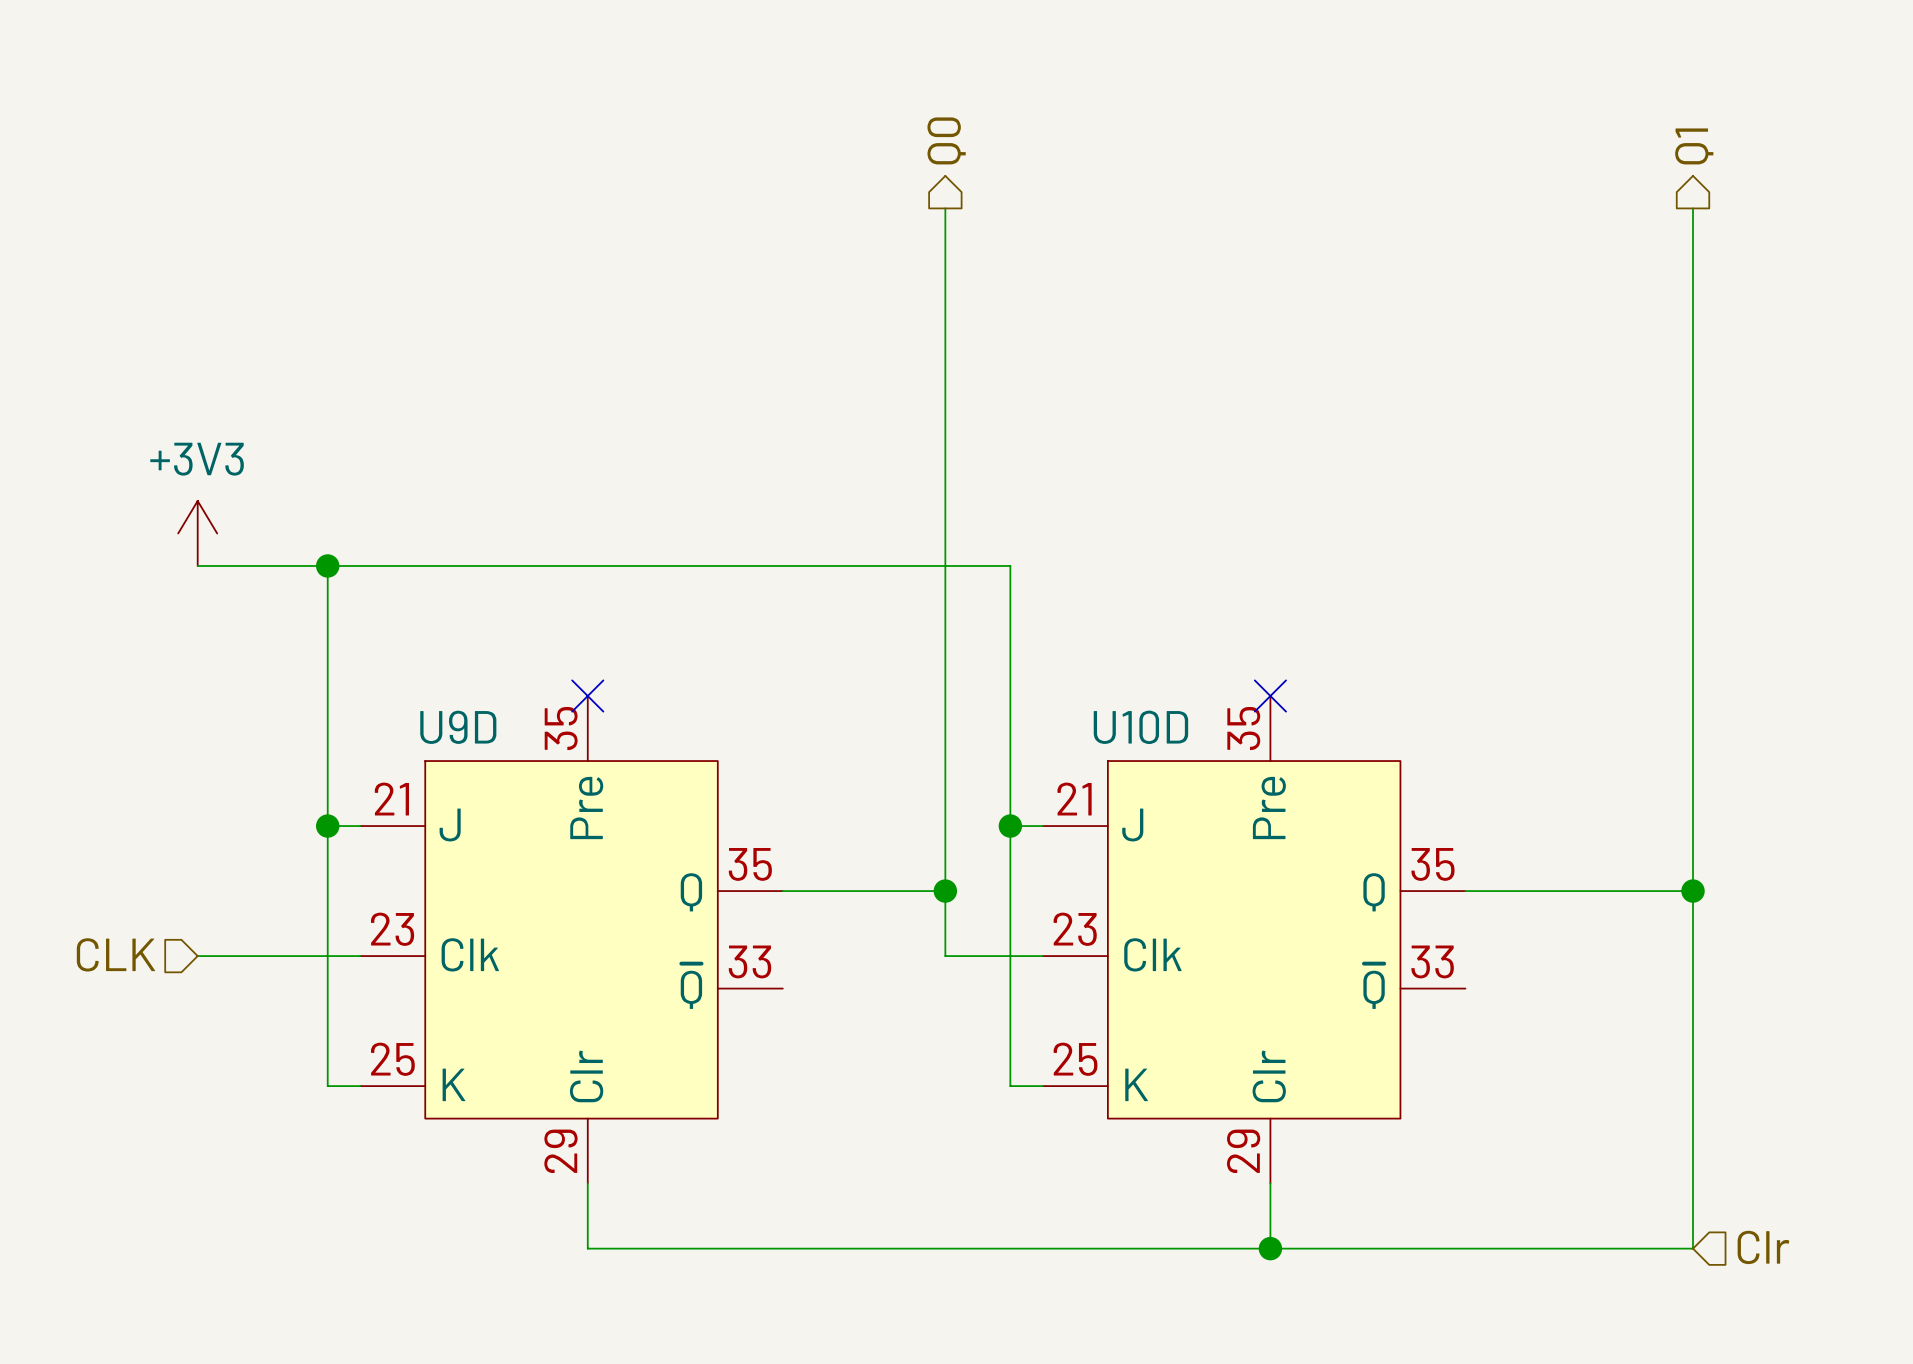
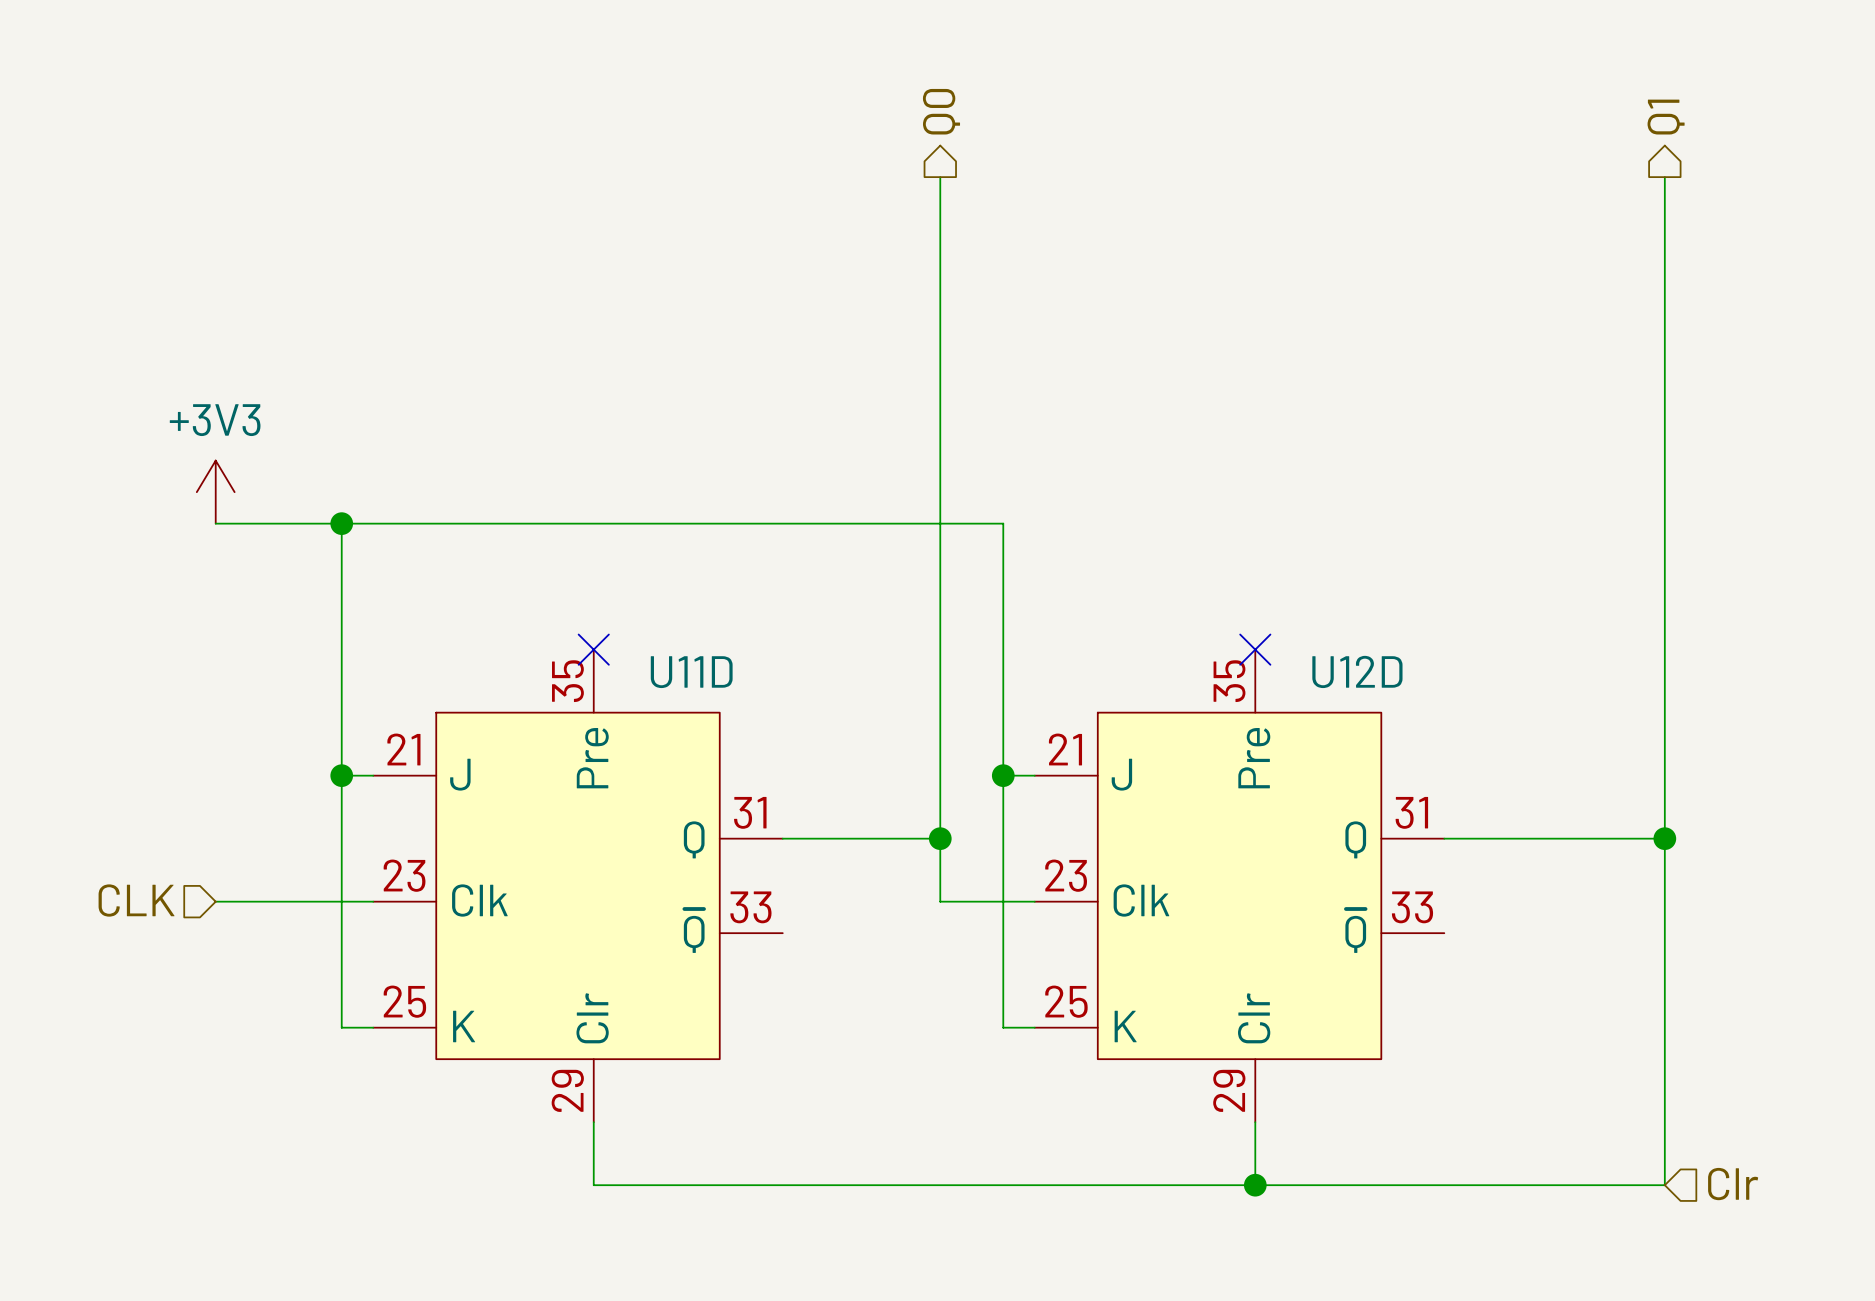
U9D name: U9D (458, 727) -> U11D (691, 672)
U10D name: U10D (1140, 727) -> U12D (1357, 671)
U9D pin number: 35 (750, 864) -> 31 (750, 812)
U10D pin number: 35 (1432, 864) -> 31 (1411, 812)

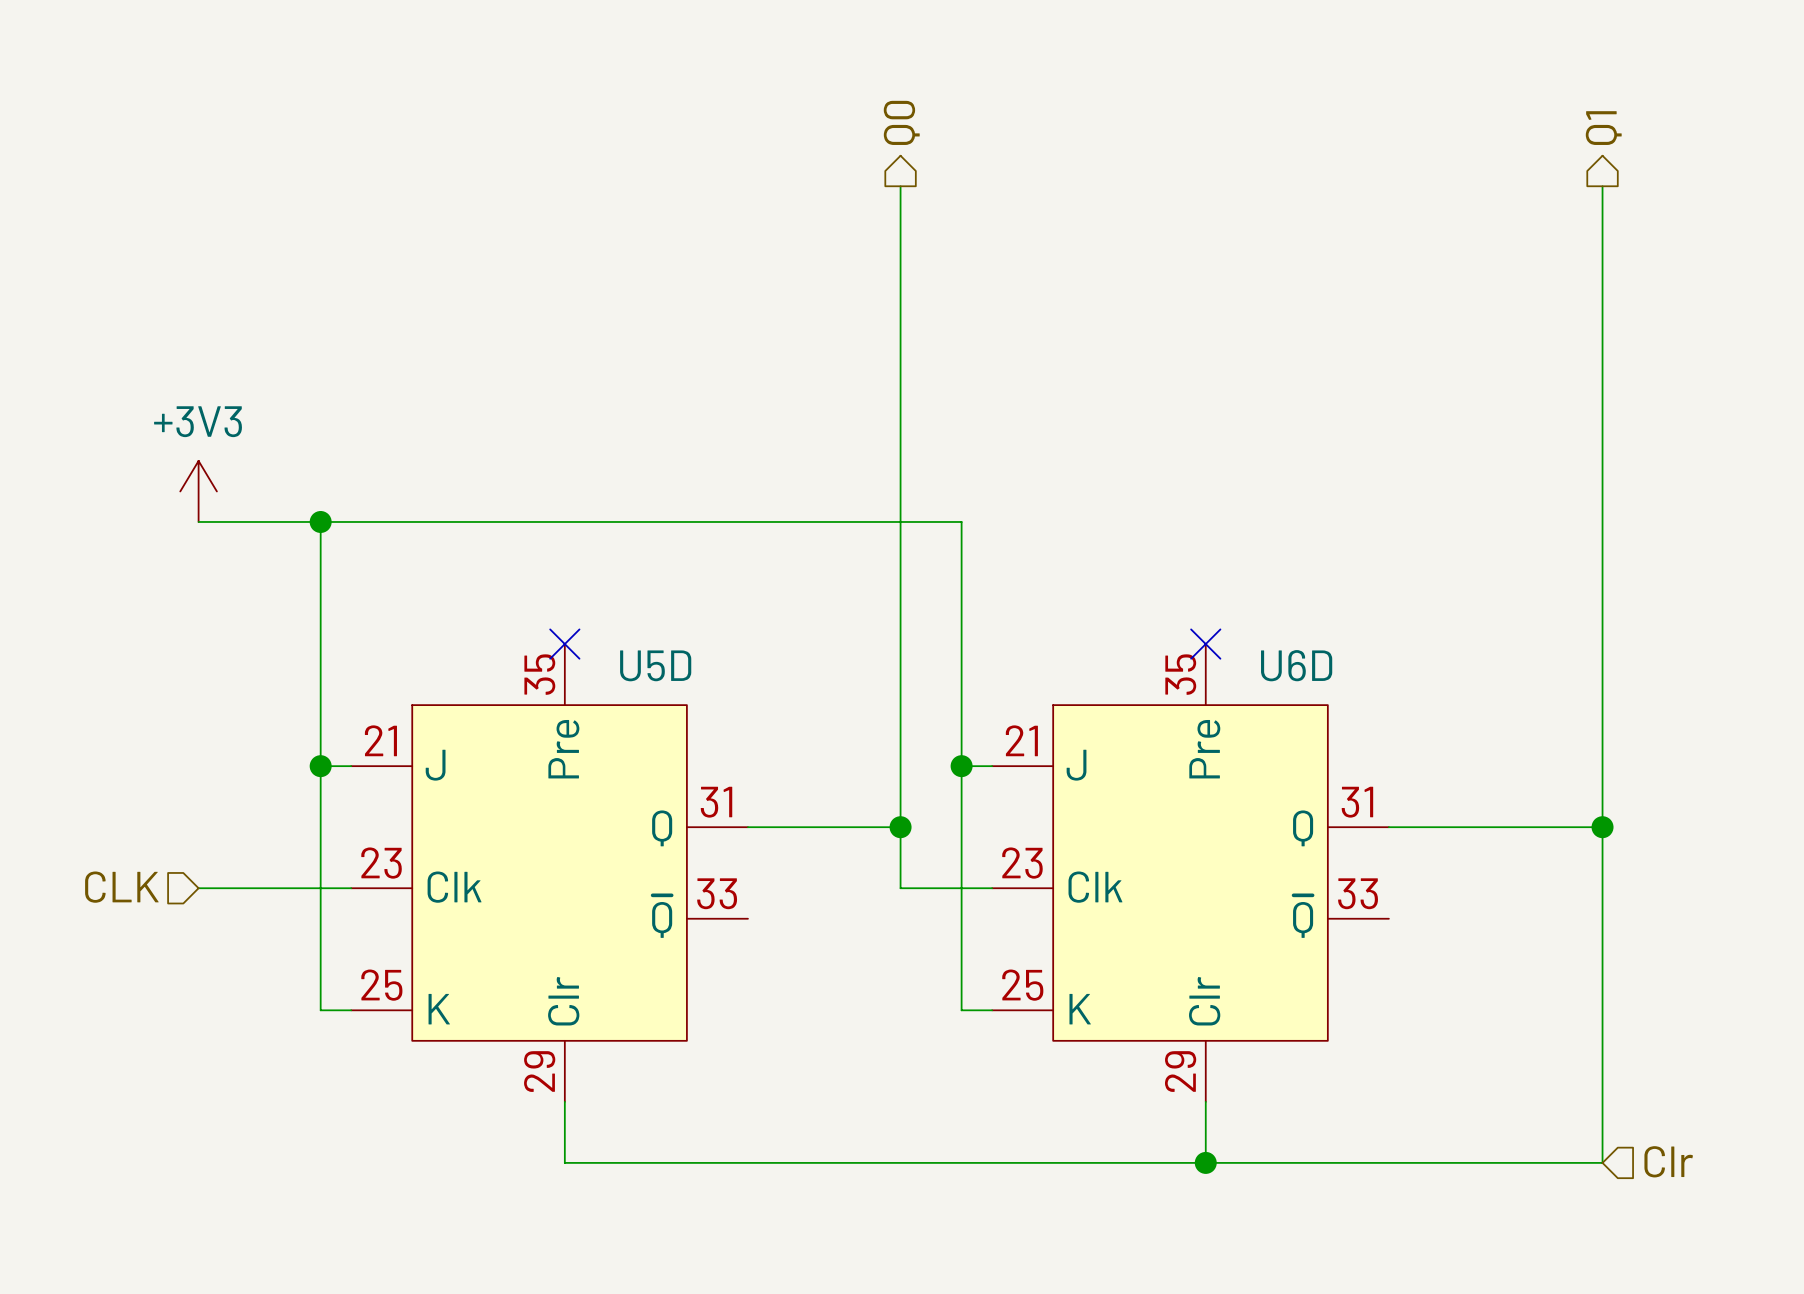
U12D name: U12D (1357, 671) -> U6D (1296, 665)
U11D name: U11D (691, 672) -> U5D (655, 665)

